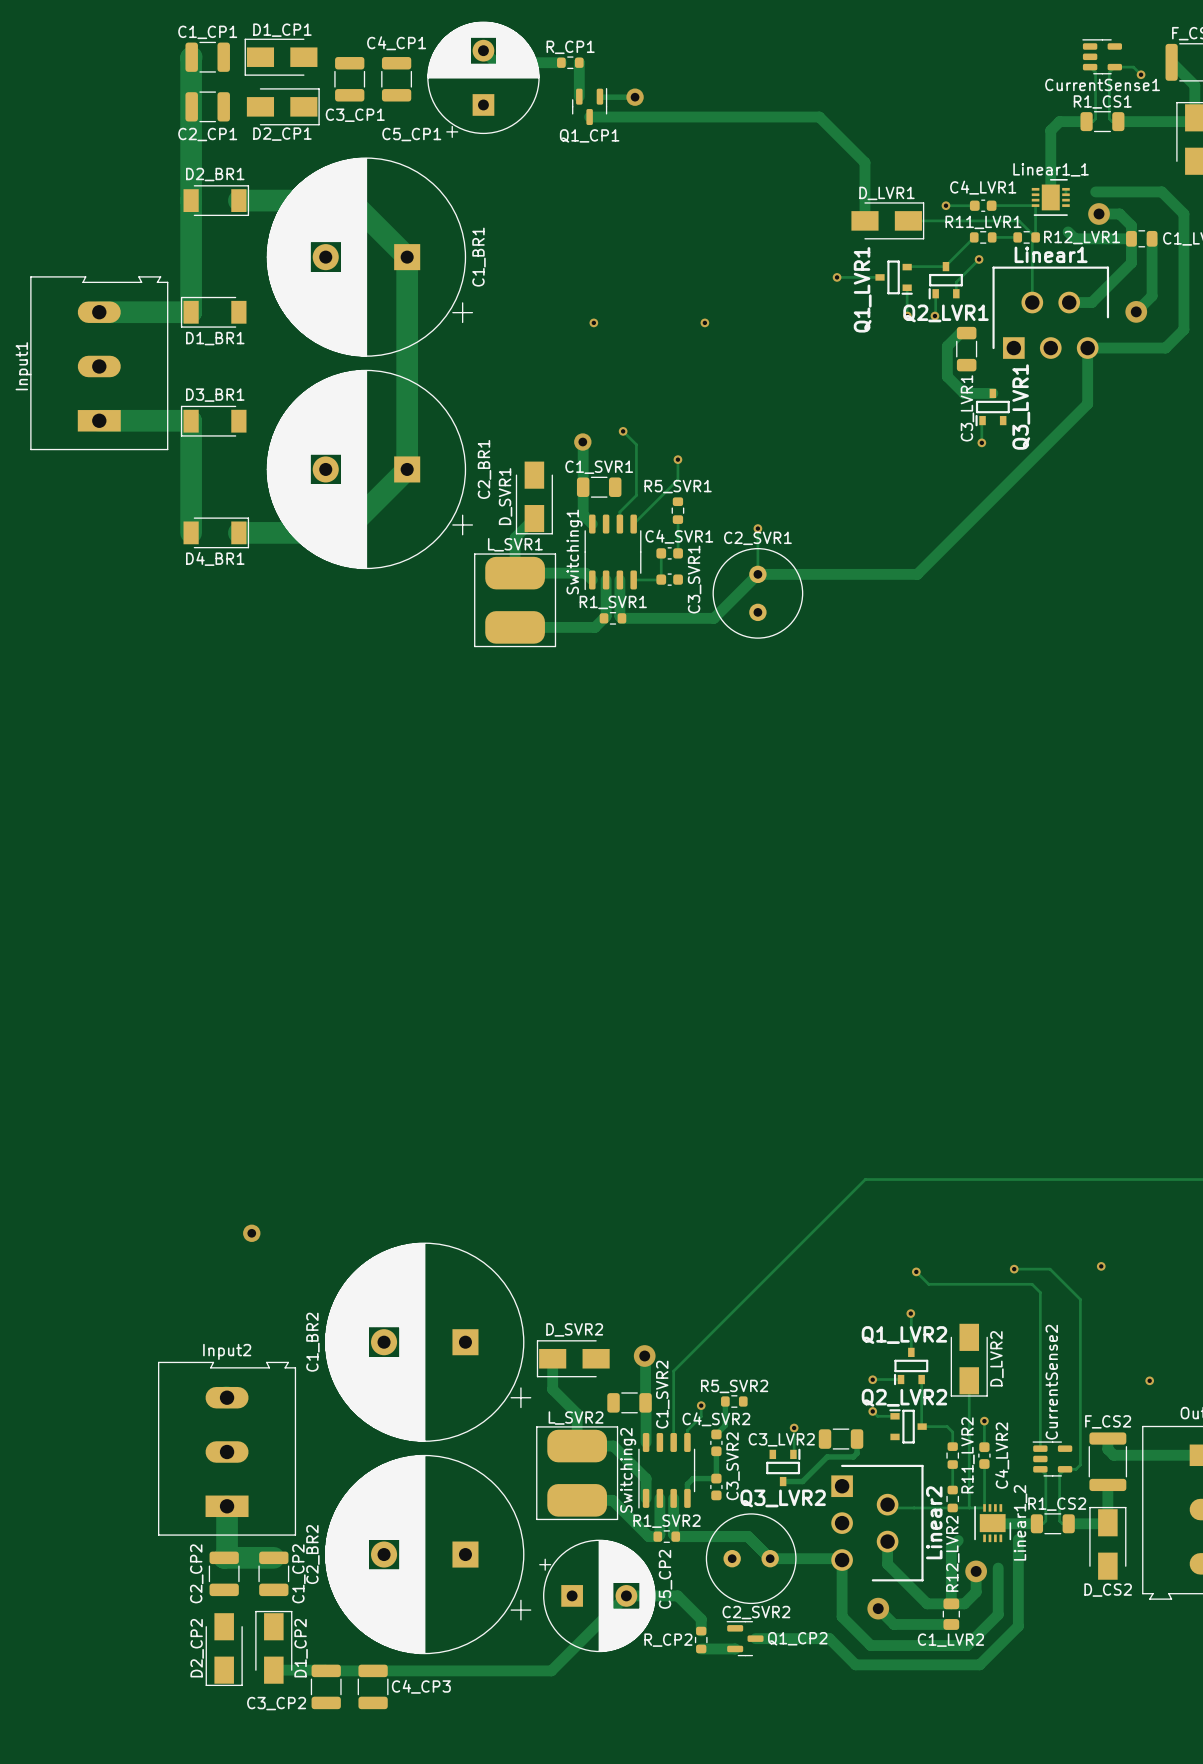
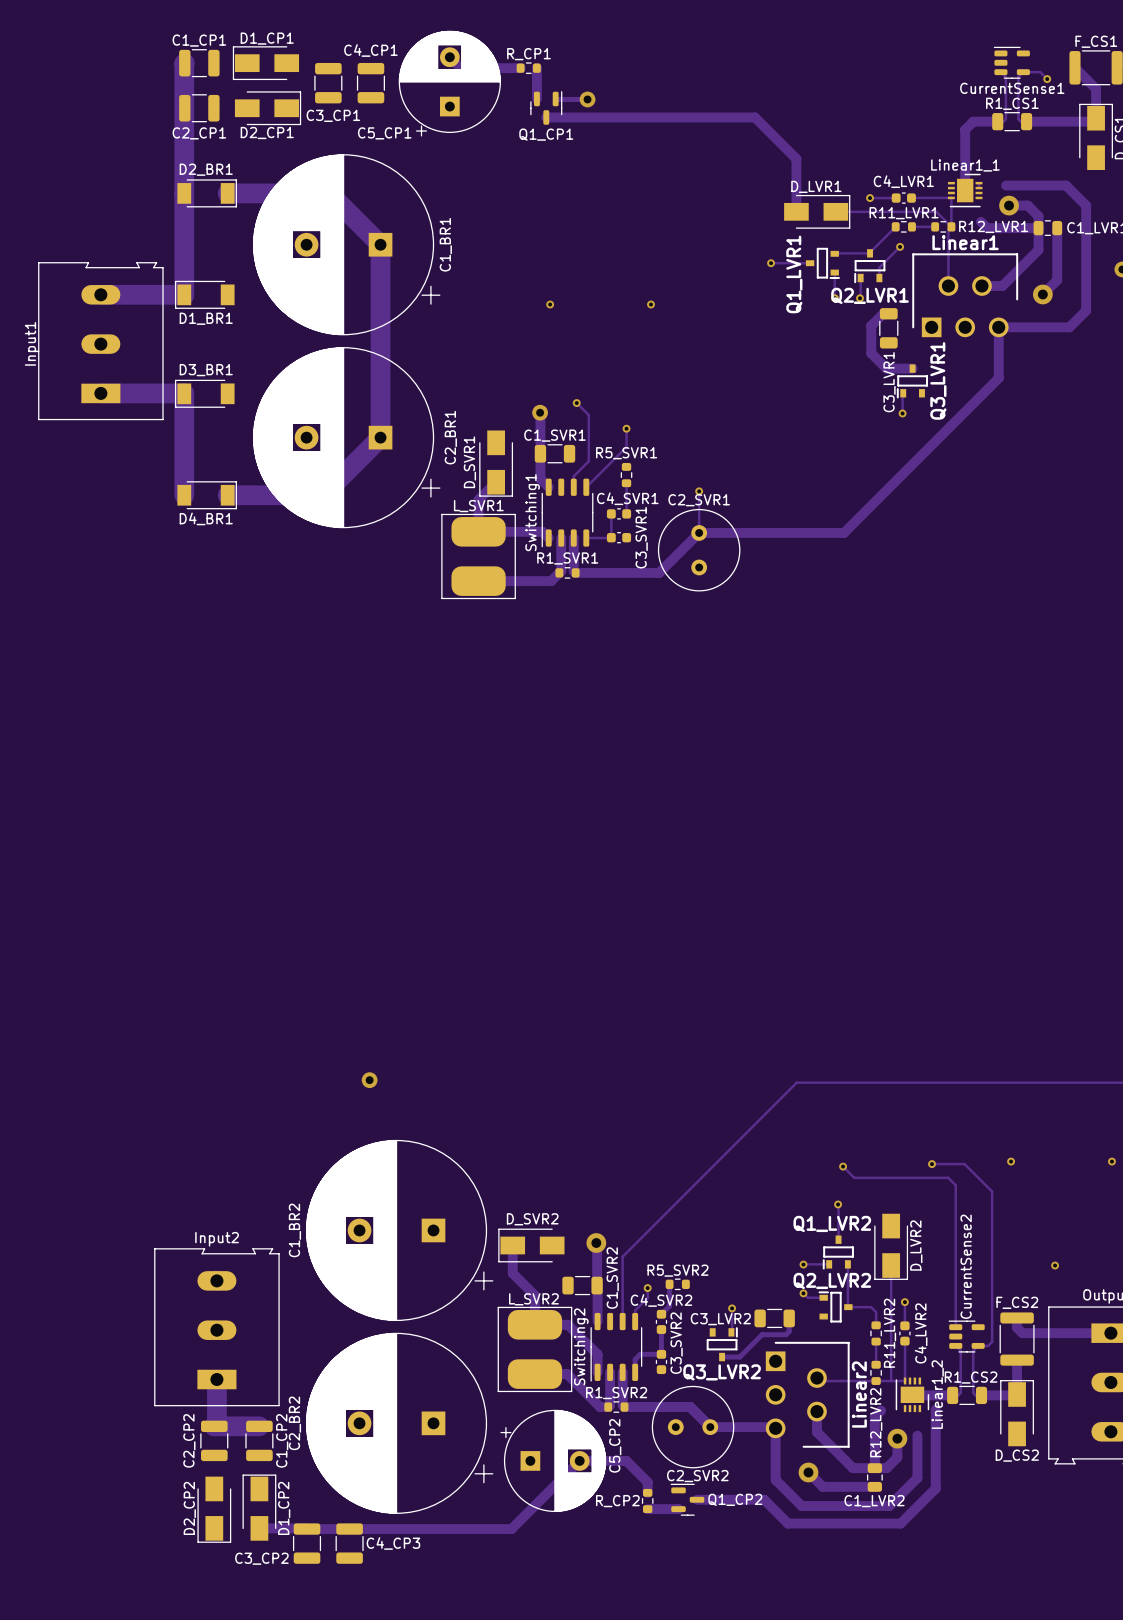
via: none -> (369, 1080)
via: (251, 1233) -> none

